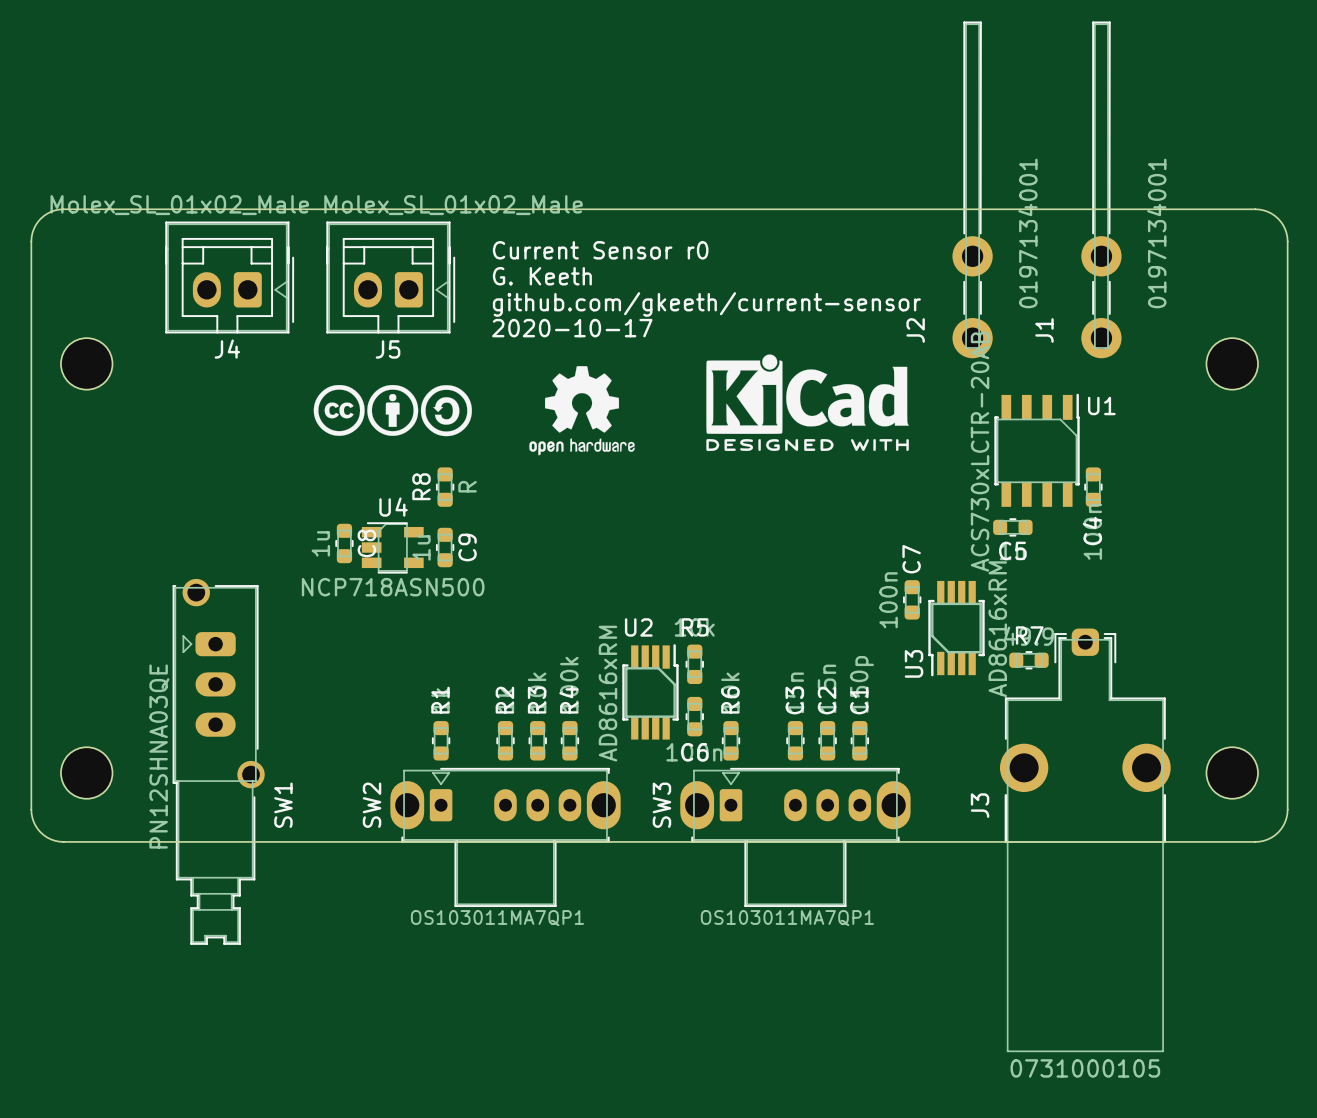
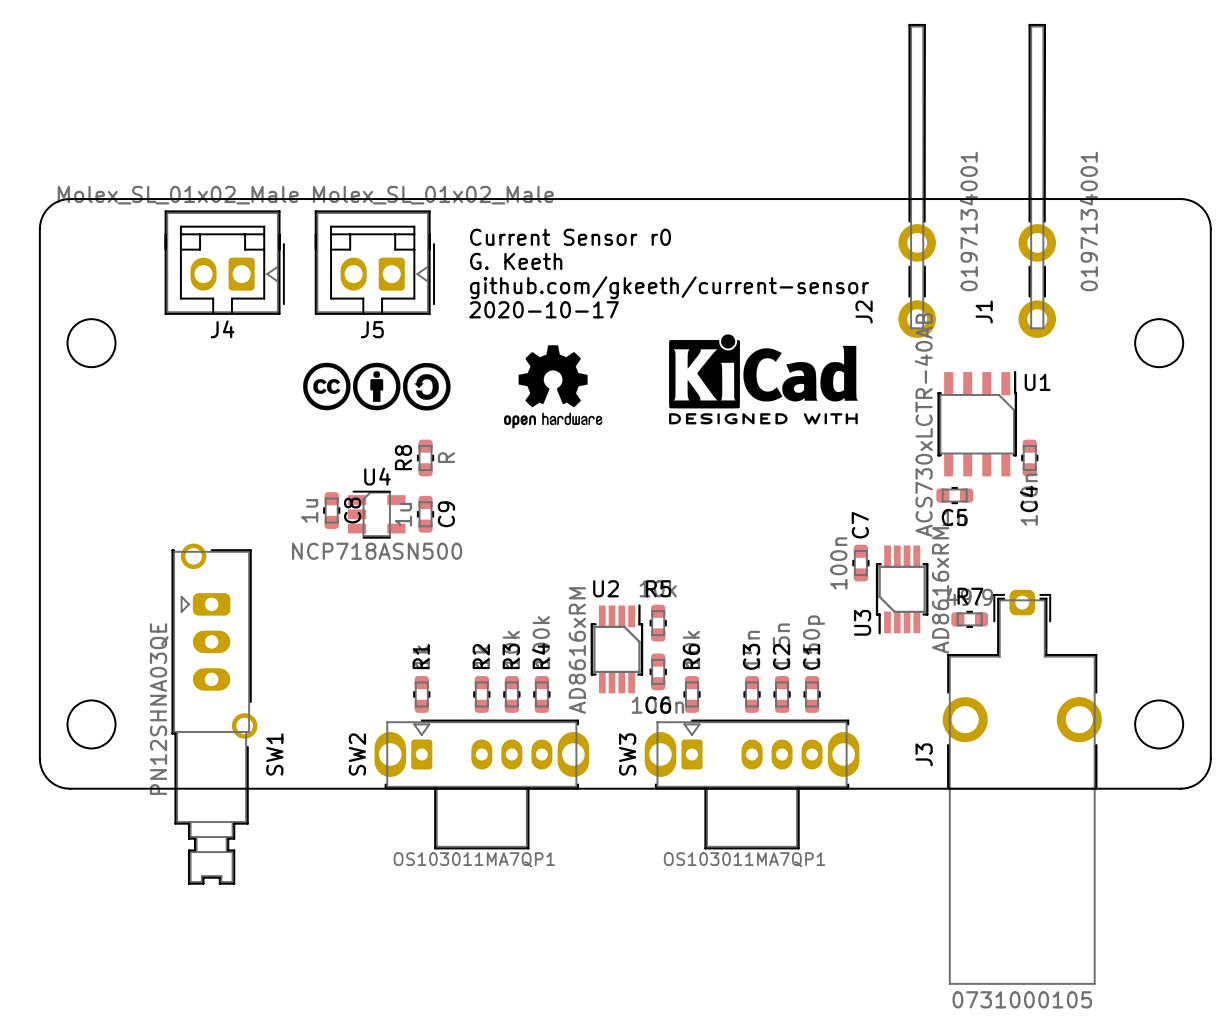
U1 value: ACS730xLCTR-20AB (980, 451) -> ACS730xLCTR-40AB (923, 424)

